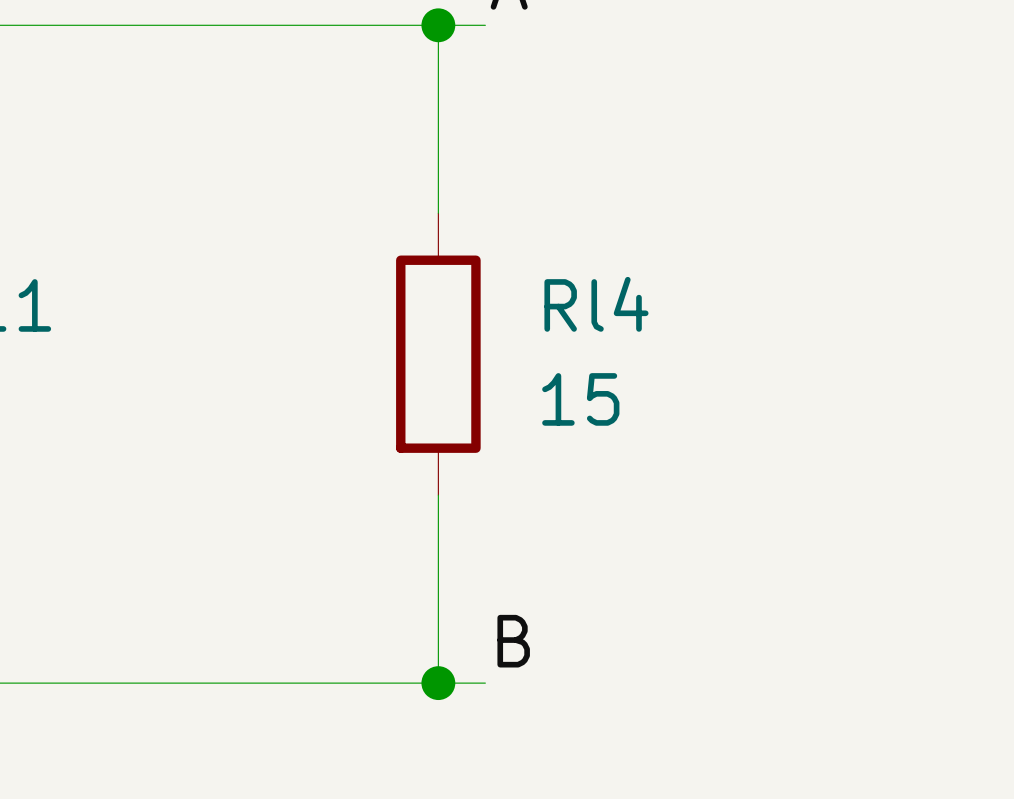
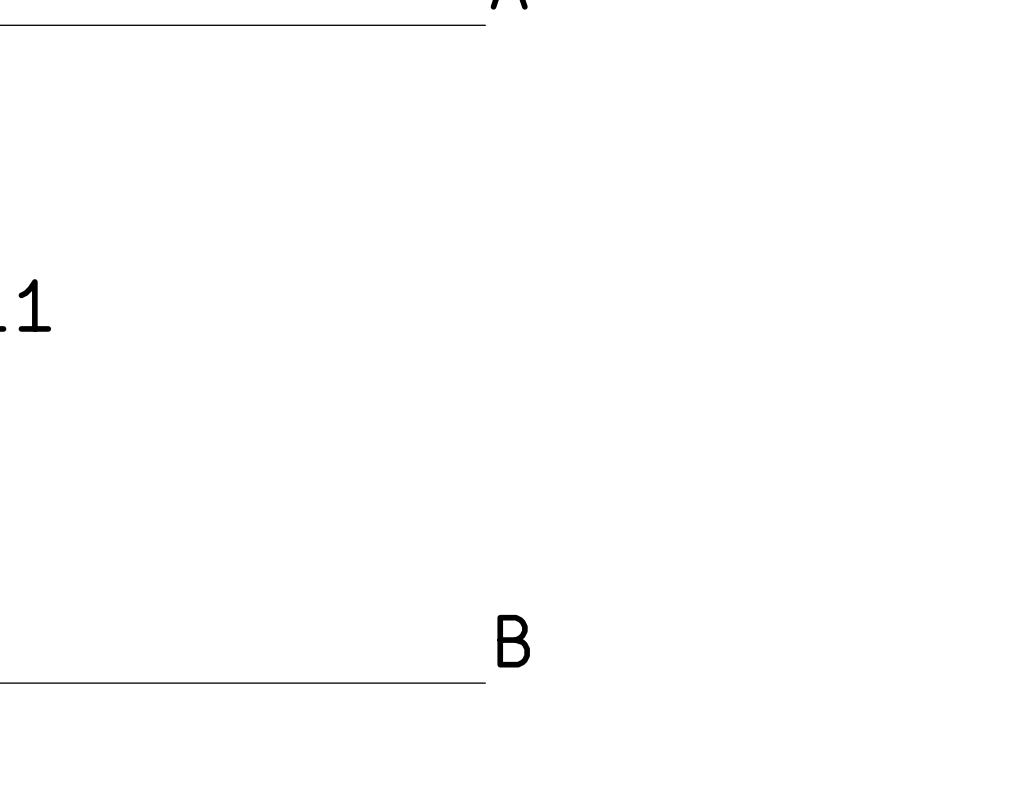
wire: (438, 25) (438, 213) -> none
junction: (438, 25) -> none
Rl4: 15 (438, 354) -> none
wire: (438, 495) (438, 683) -> none
junction: (438, 683) -> none

